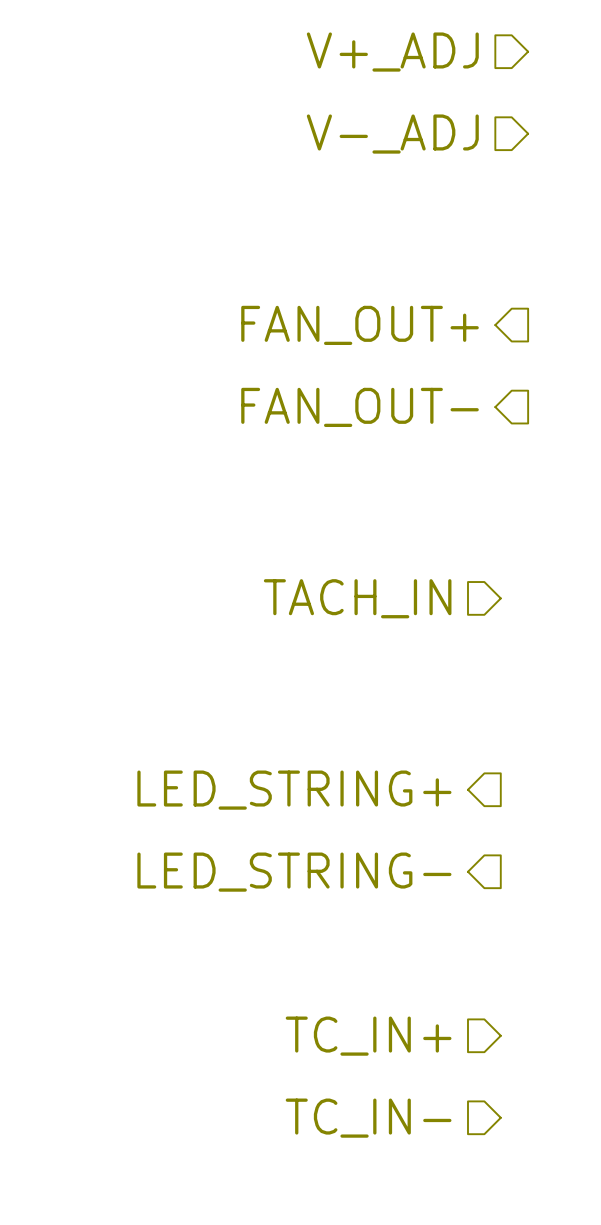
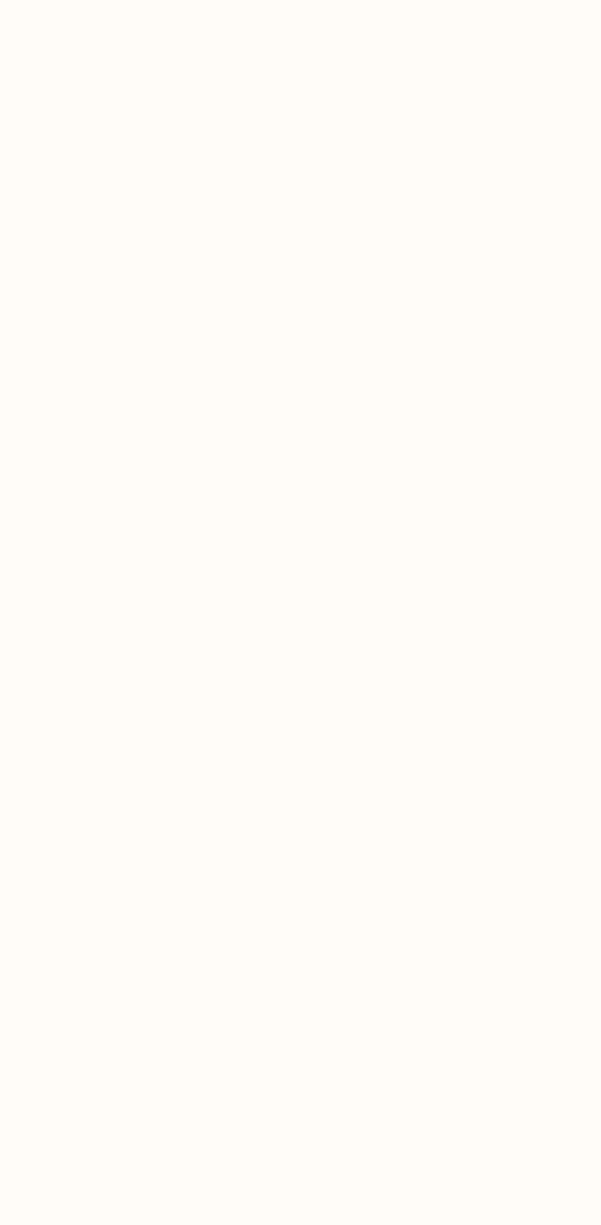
hierarchical label: V+_ADJ (392, 52) -> none
hierarchical label: V-_ADJ (392, 134) -> none
hierarchical label: FAN_OUT+ (360, 325) -> none
hierarchical label: FAN_OUT- (360, 407) -> none
hierarchical label: TACH_IN (357, 598) -> none
hierarchical label: LED_STRING+ (294, 790) -> none
hierarchical label: LED_STRING- (294, 872) -> none
hierarchical label: TC_IN+ (368, 1036) -> none
hierarchical label: TC_IN- (368, 1118) -> none

